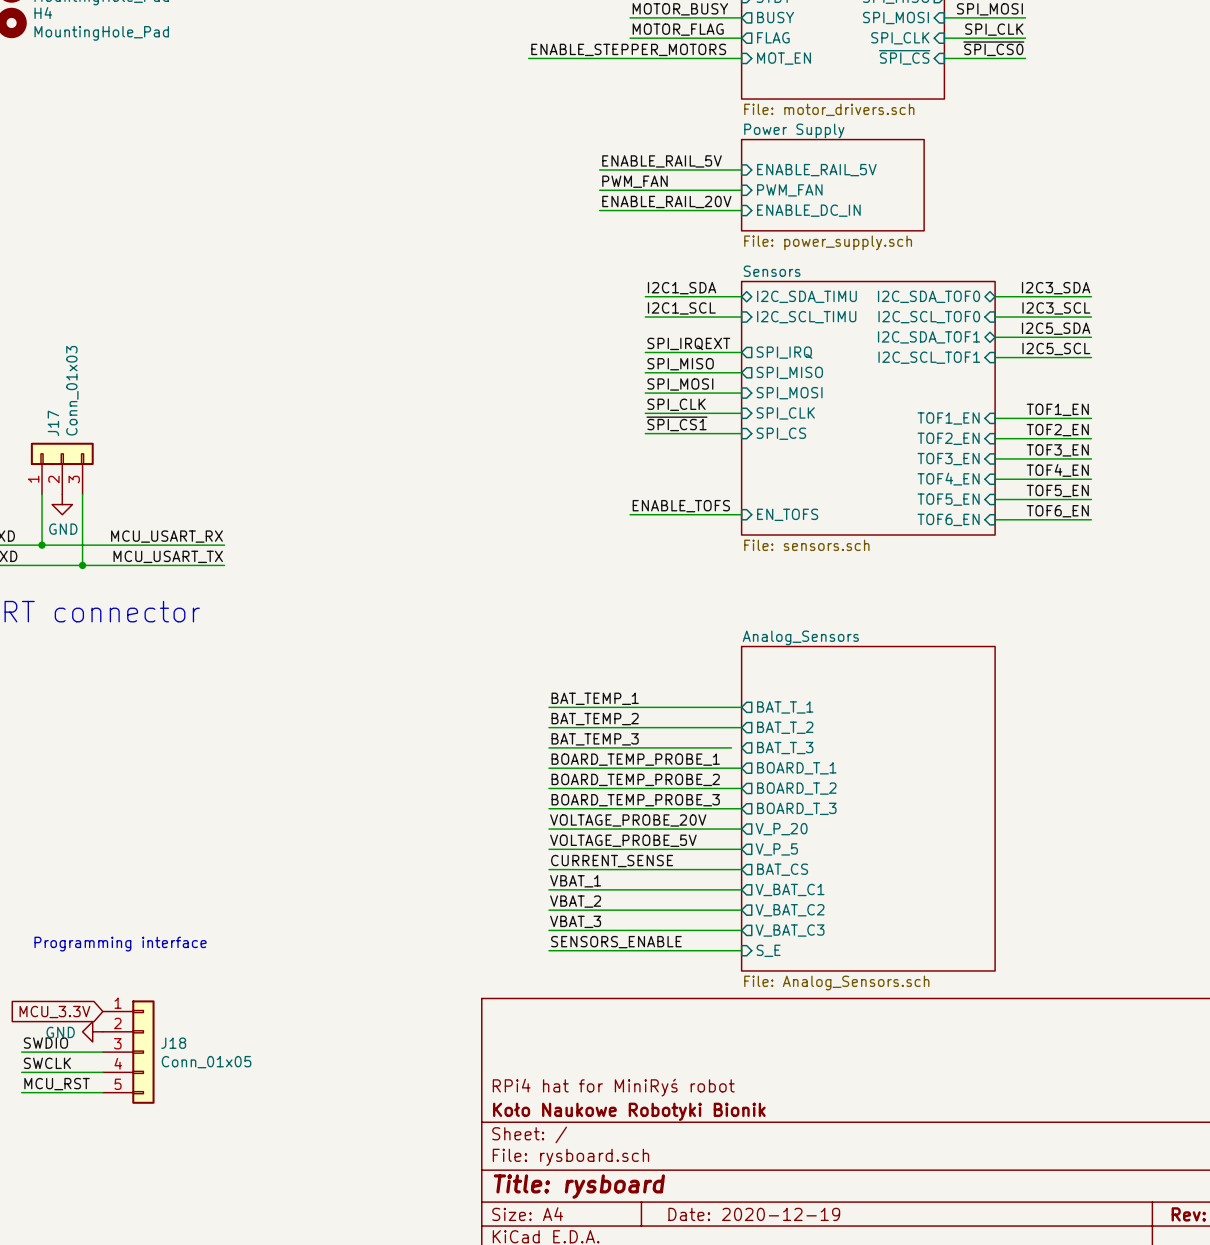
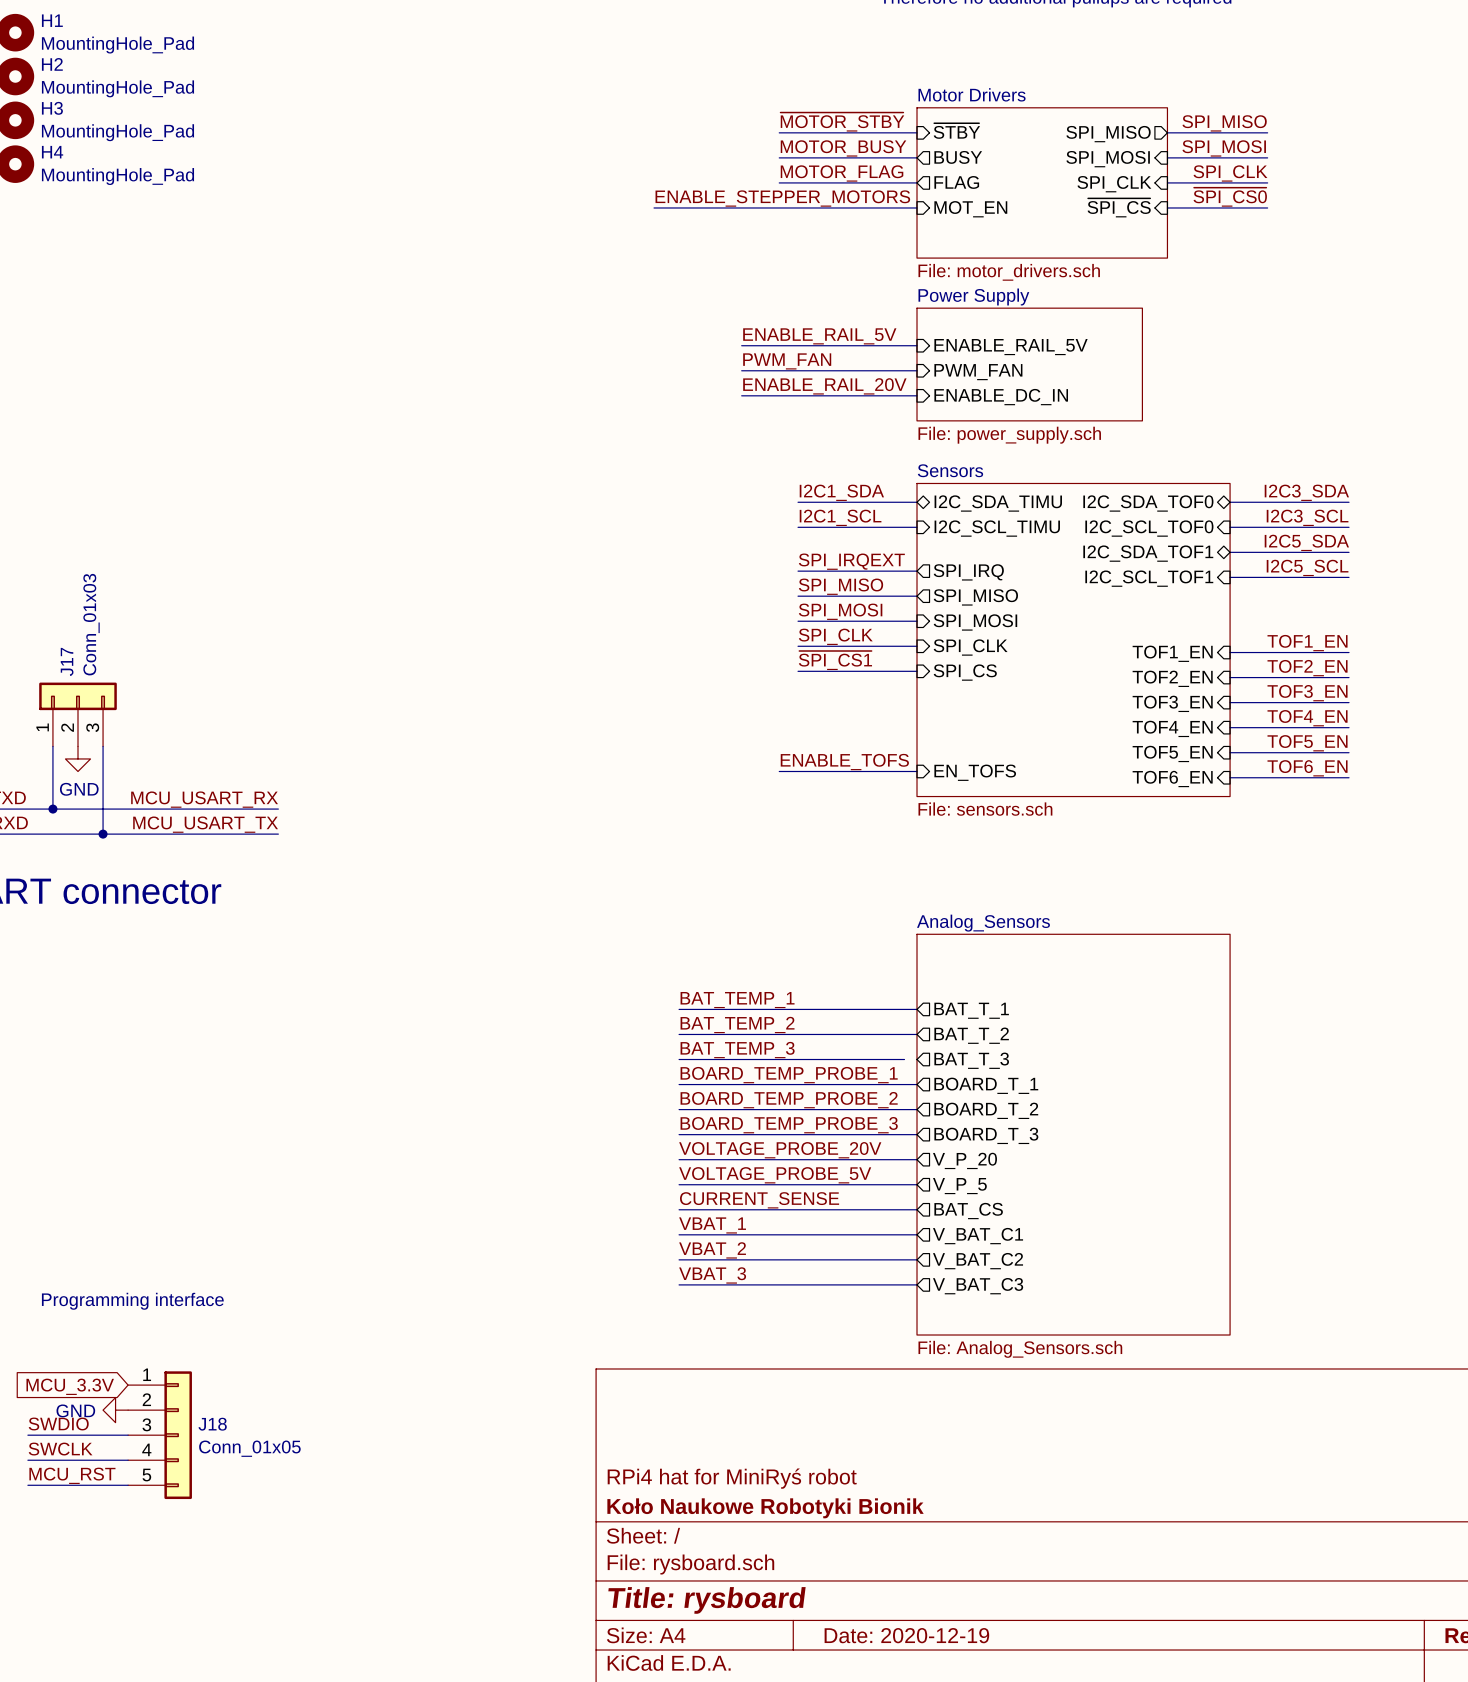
label: SENSORS_ENABLE (616, 942) -> none
wire: (548, 950) (741, 950) -> none
sheet pin: S_E (768, 950) -> none

